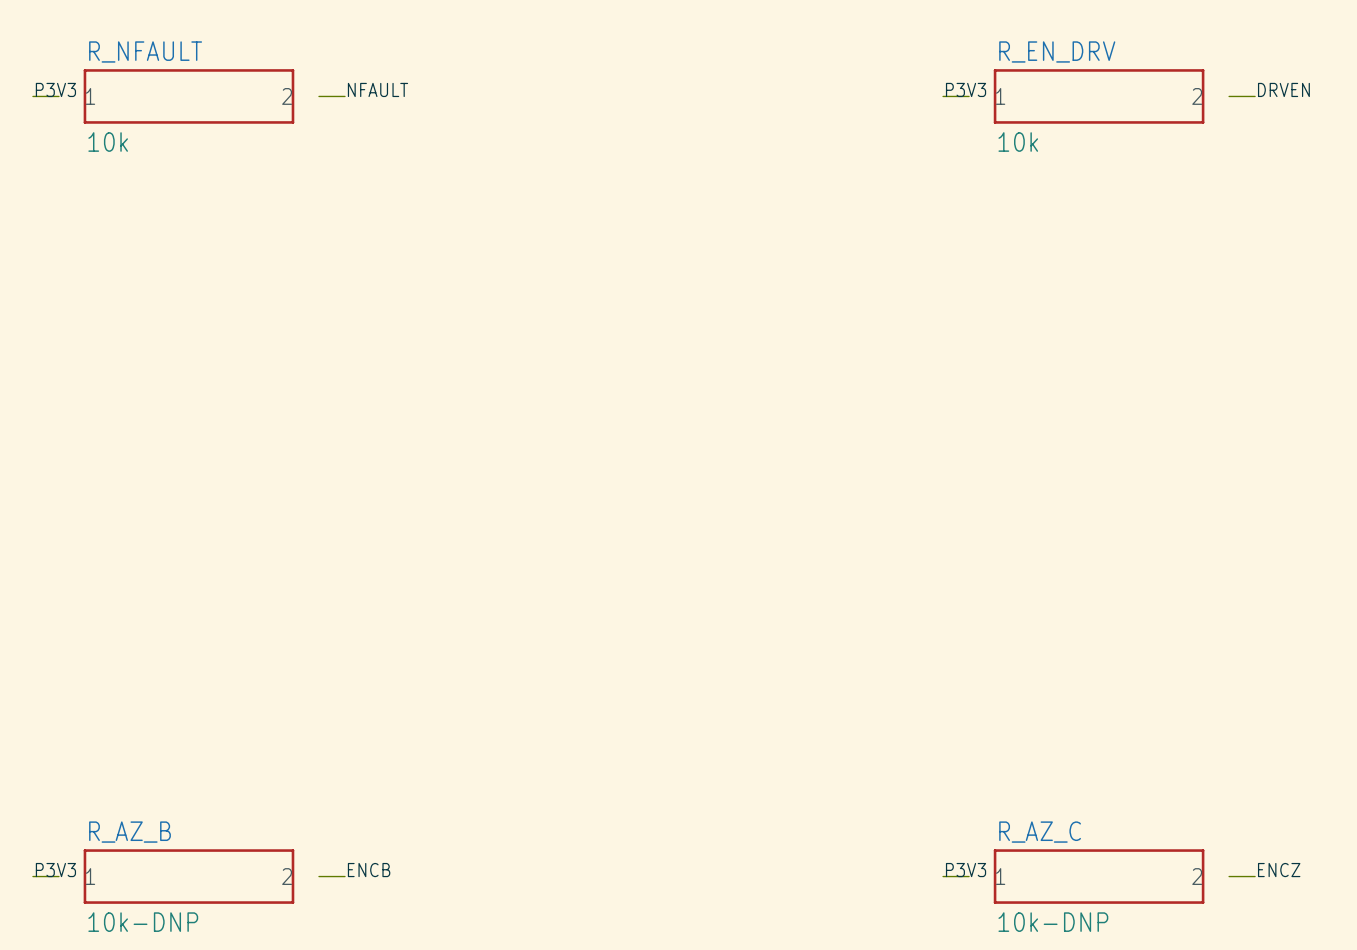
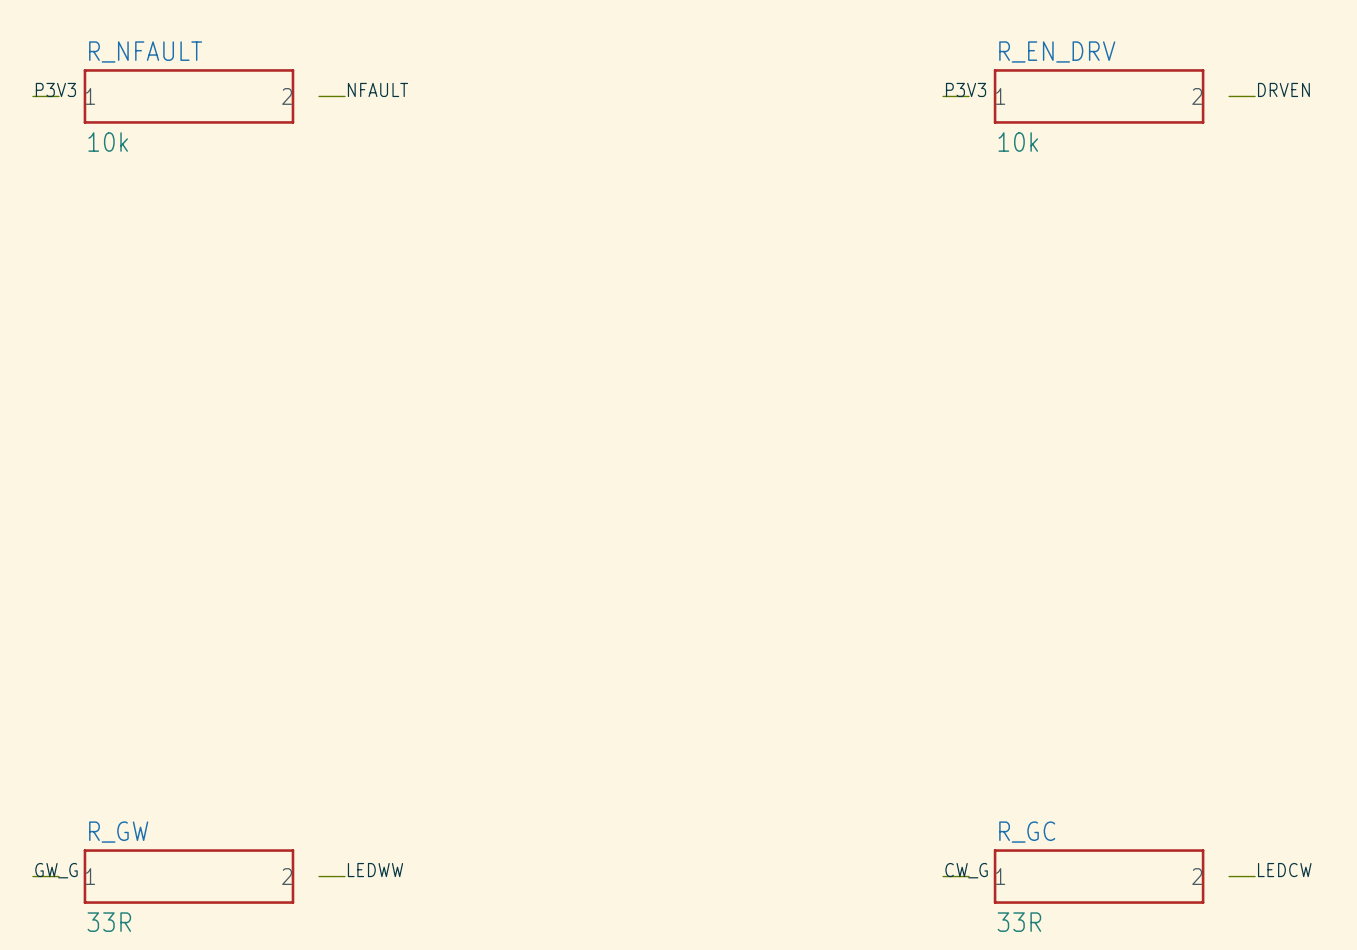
R_AZ_B name: R_AZ_B (129, 832) -> R_GW (118, 832)
R_AZ_C name: R_AZ_C (1040, 832) -> R_GC (1027, 832)
label: P3V3 (55, 870) -> GW_G (56, 870)
label: ENCB (369, 870) -> LEDWW (375, 870)
label: P3V3 (966, 870) -> CW_G (966, 870)
label: ENCZ (1279, 870) -> LEDCW (1284, 870)
R_AZ_B value: 10k-DNP (143, 922) -> 33R (109, 922)
R_AZ_C value: 10k-DNP (1053, 922) -> 33R (1019, 922)

